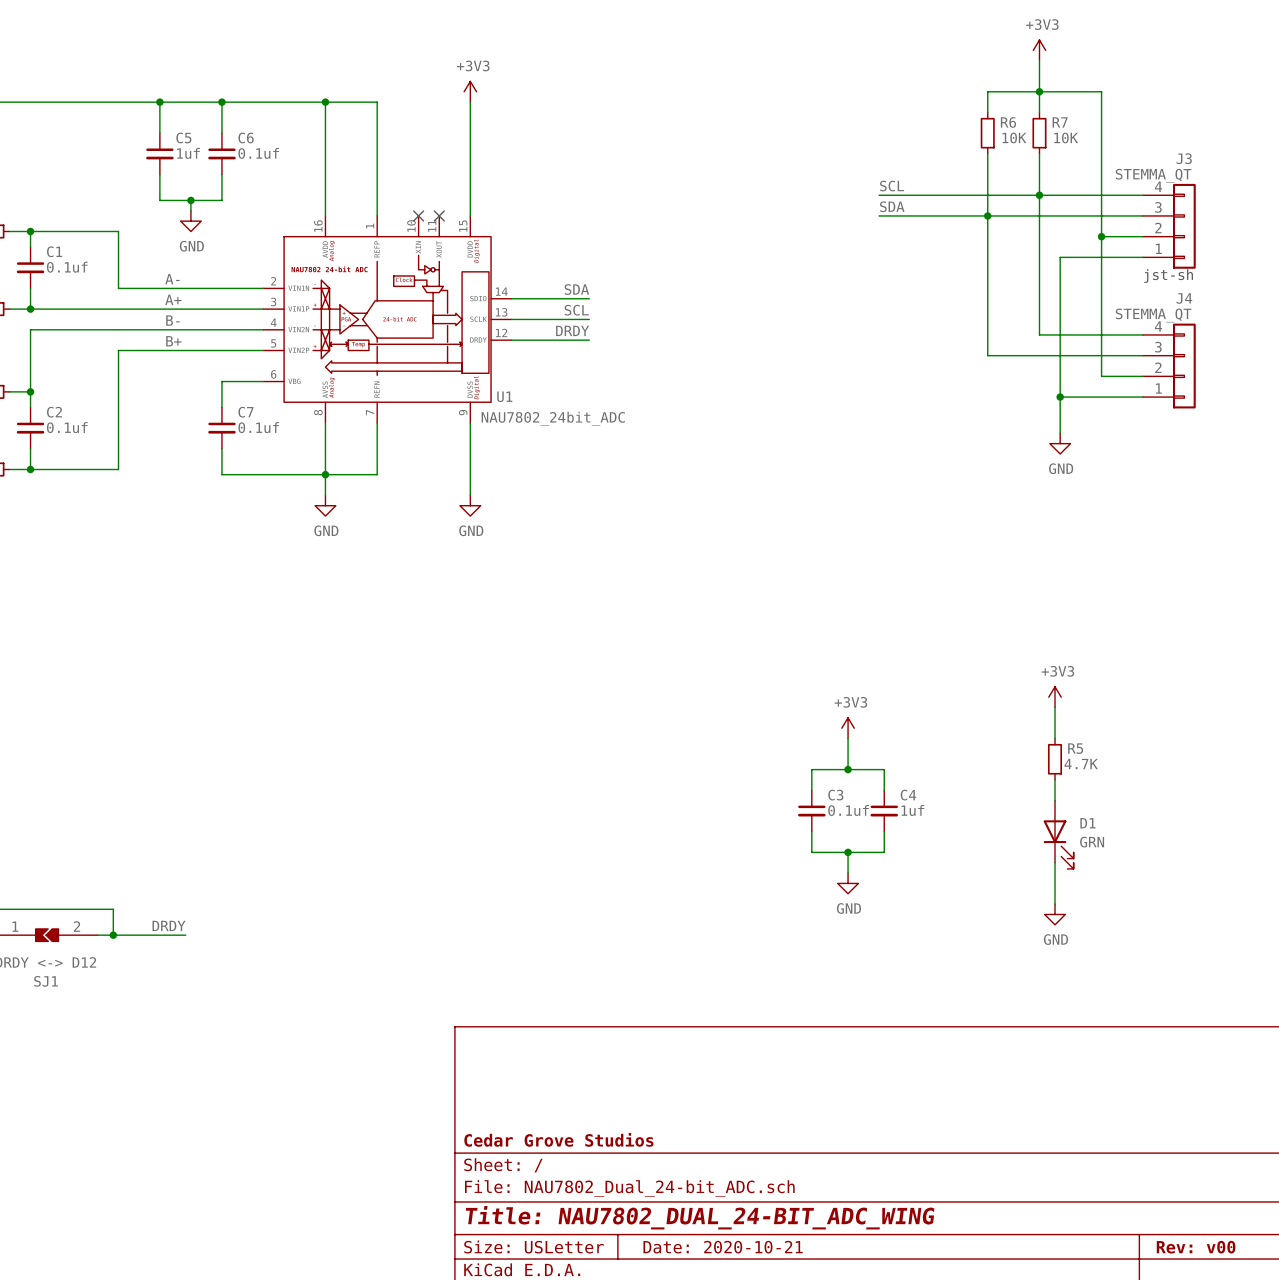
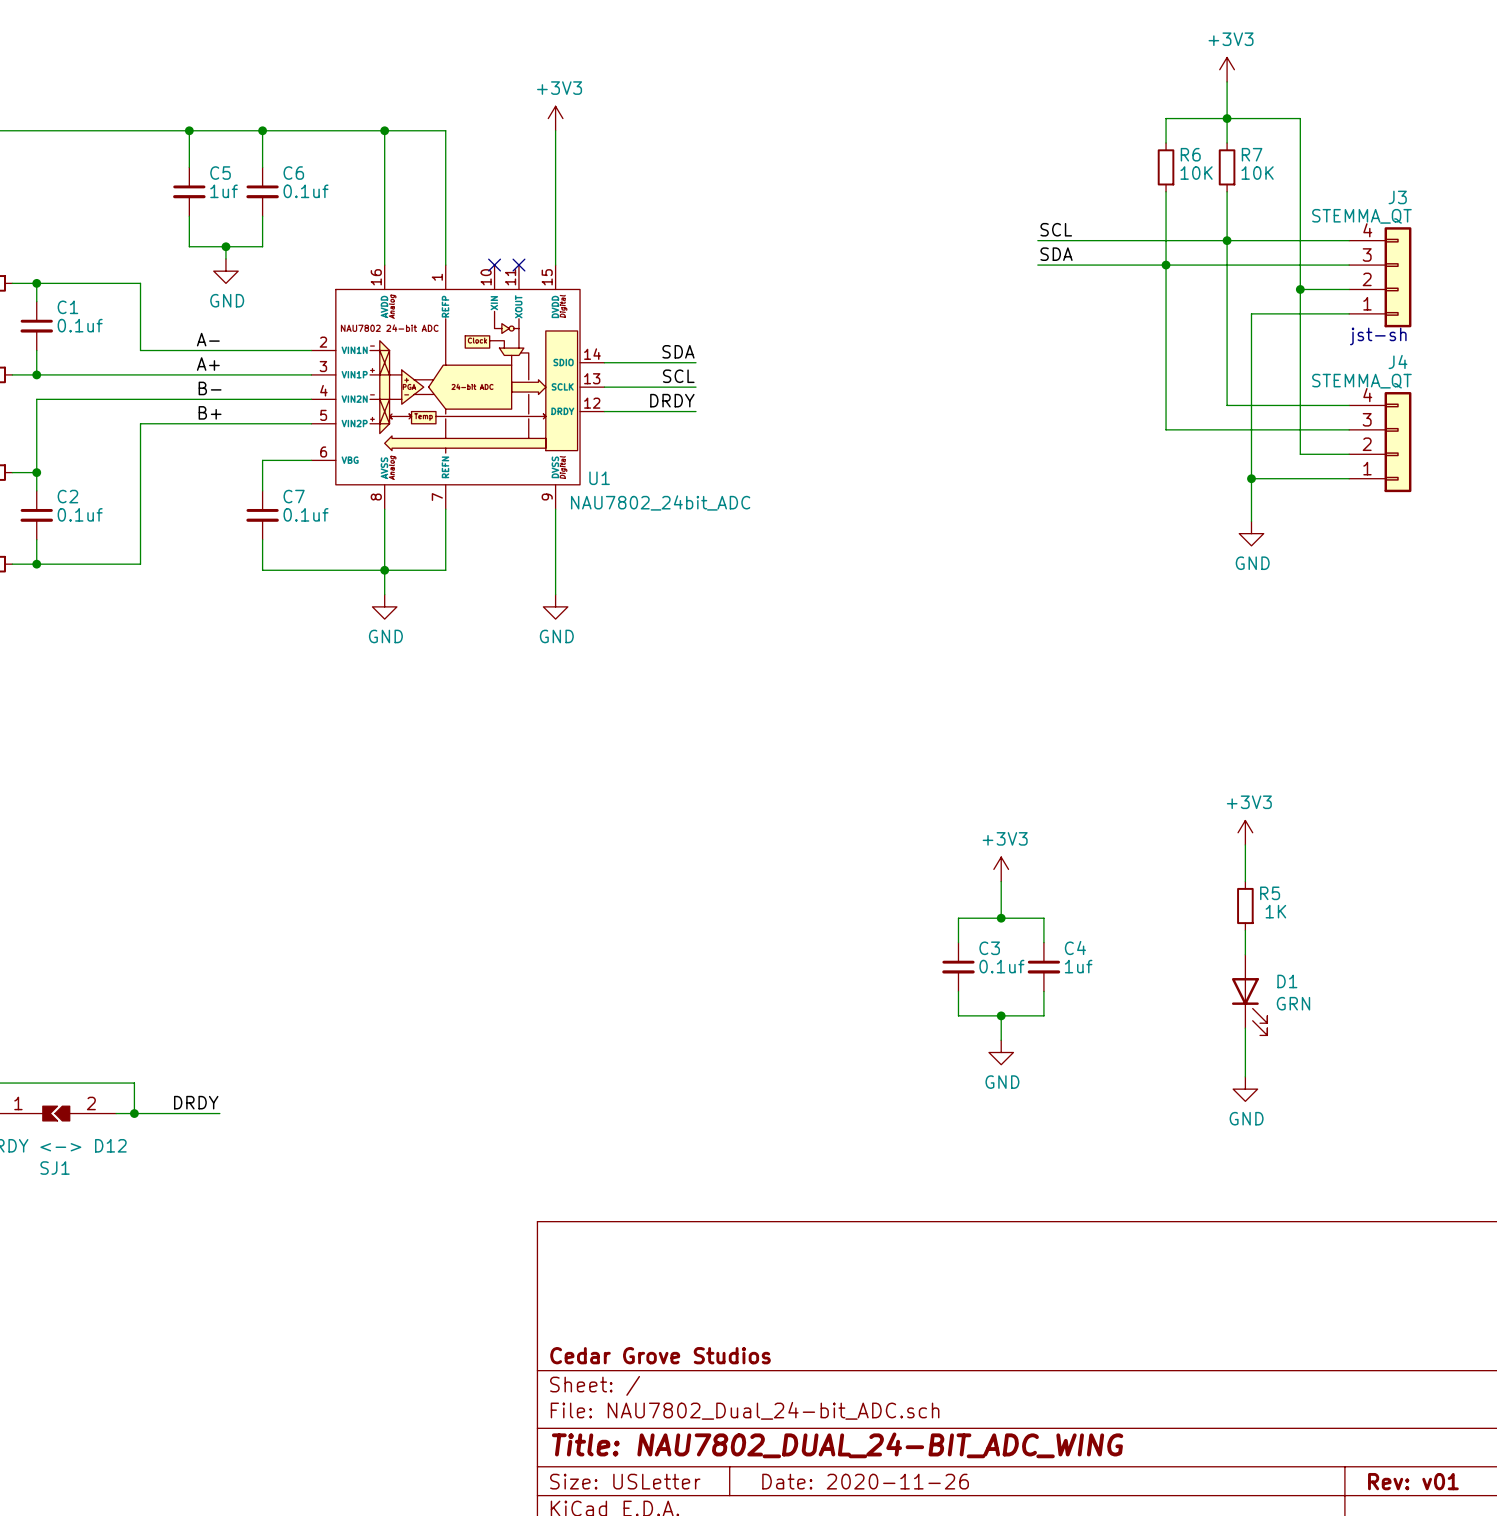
R5 value: 4.7K (1081, 764) -> 1K (1275, 911)
title block: Date: 2020-10-21 (723, 1247) -> Date: 2020-11-26 (865, 1481)
title block: Rev: v00 (1196, 1247) -> Rev: v01 (1413, 1481)

